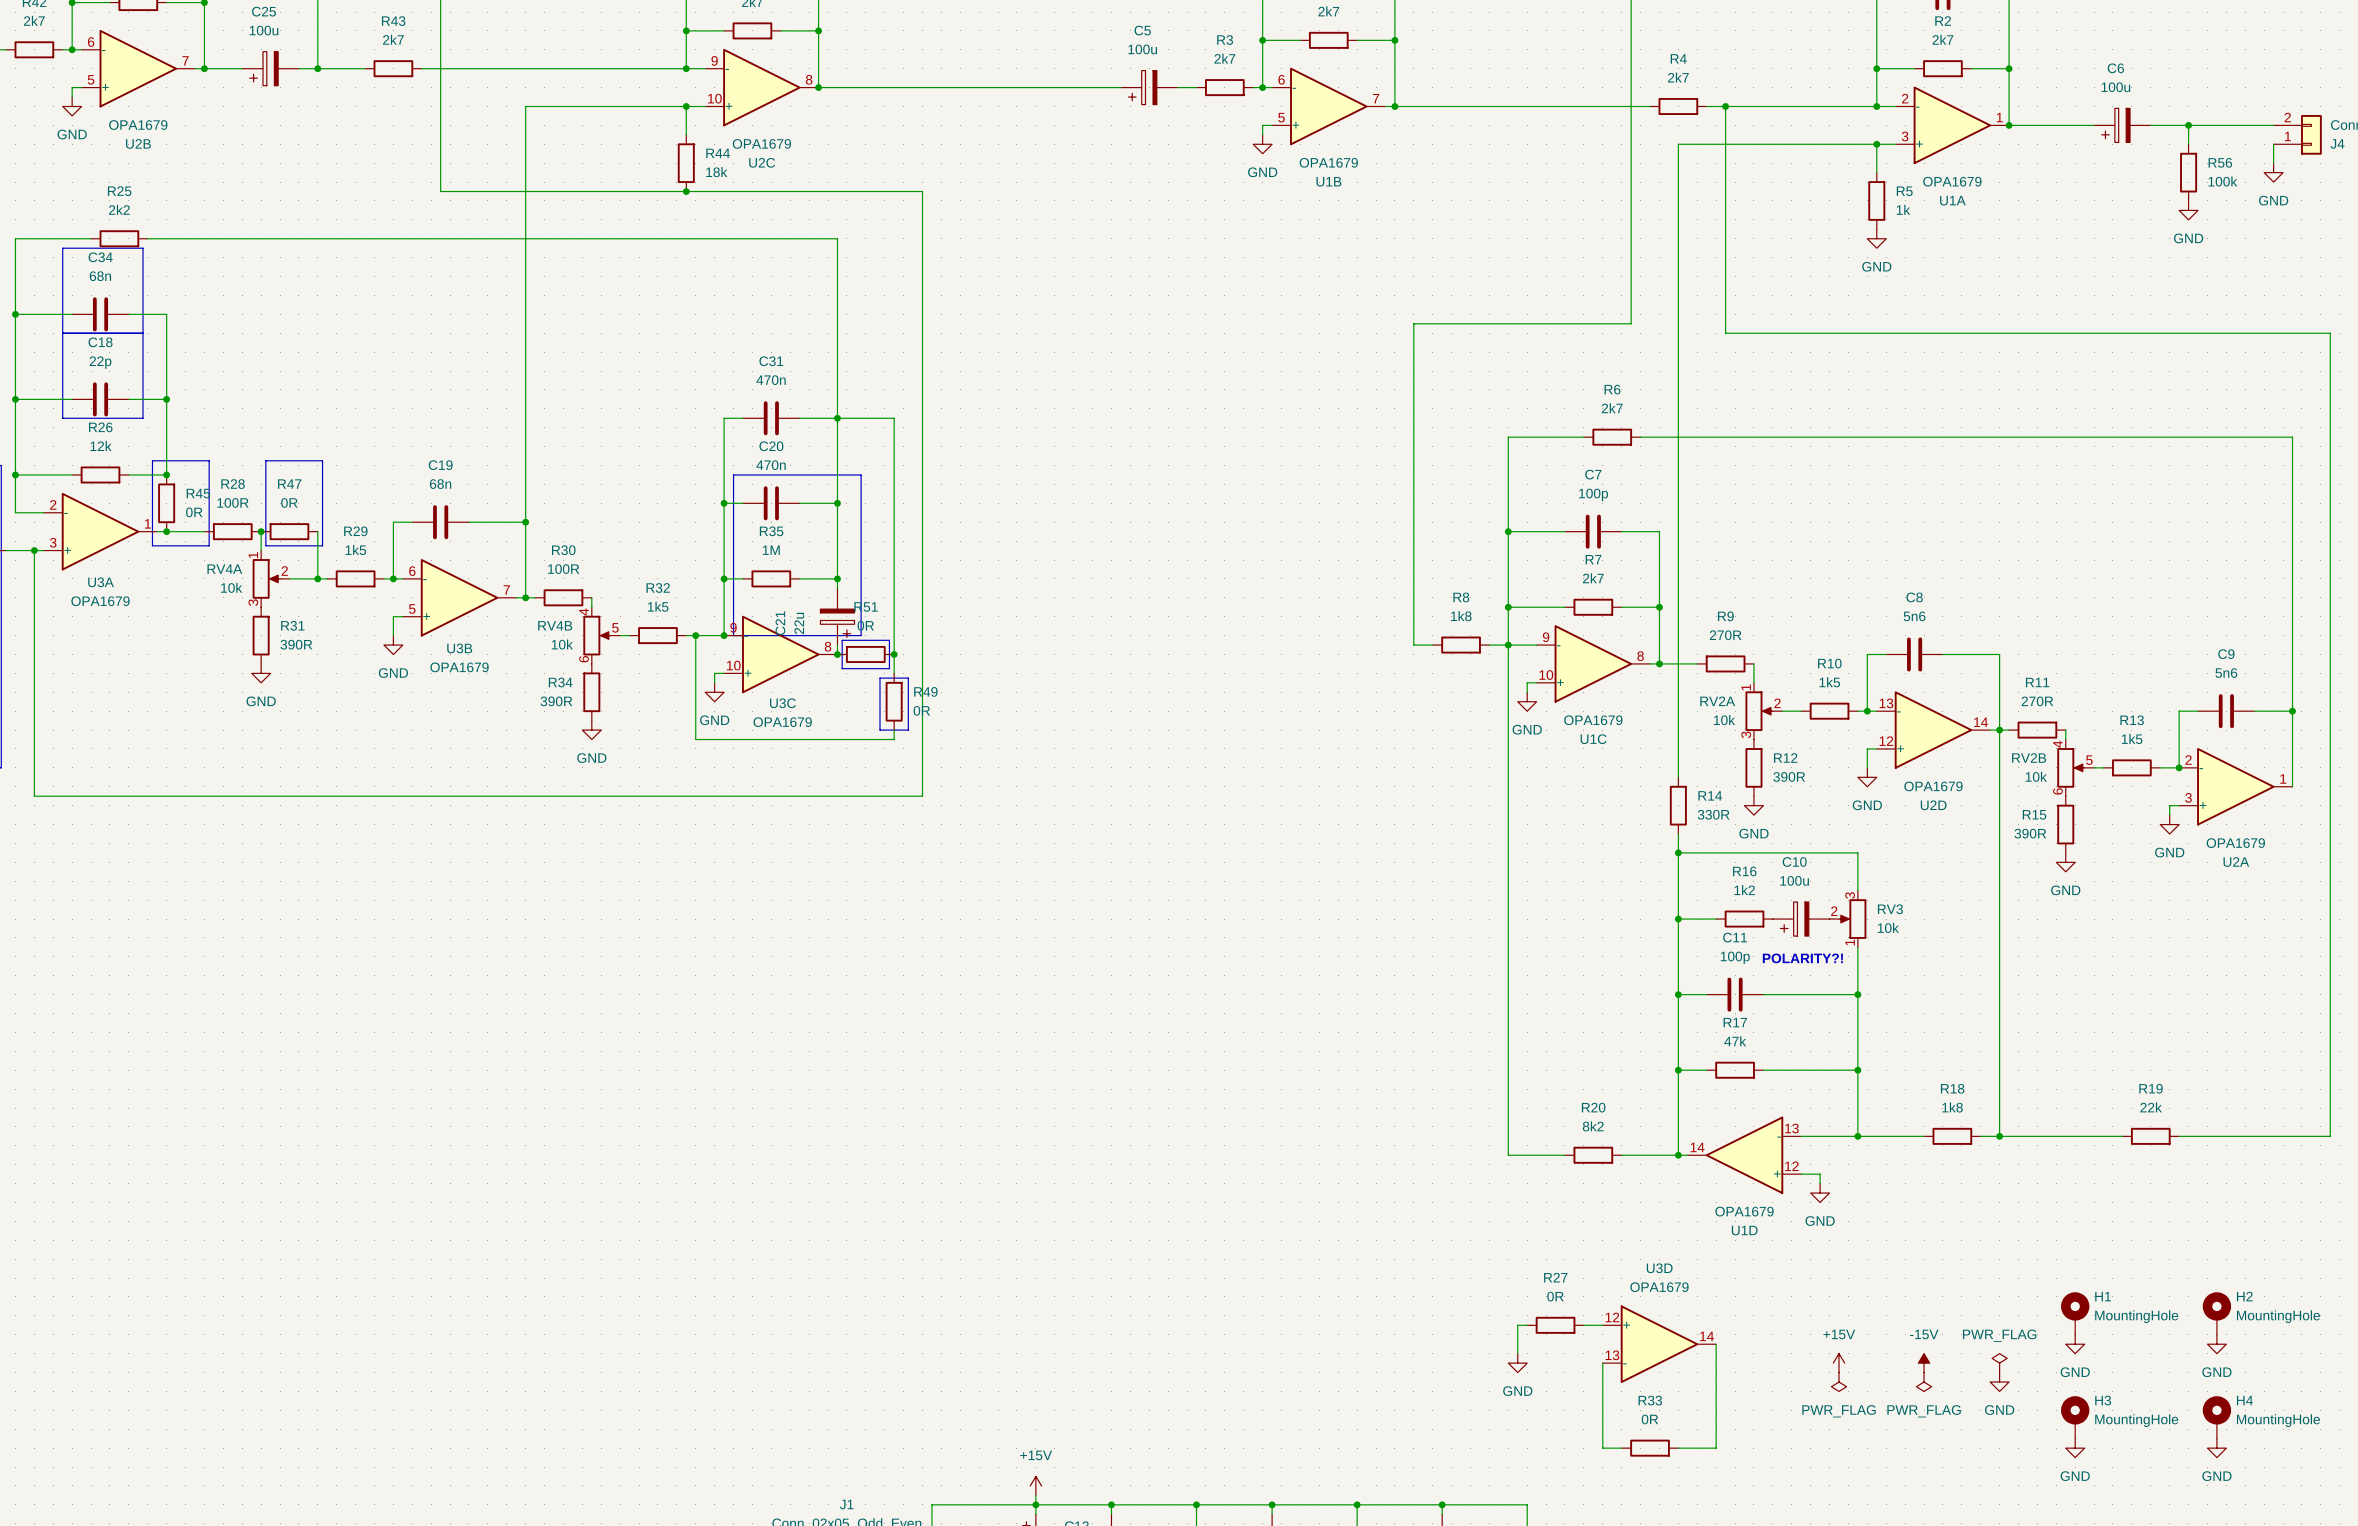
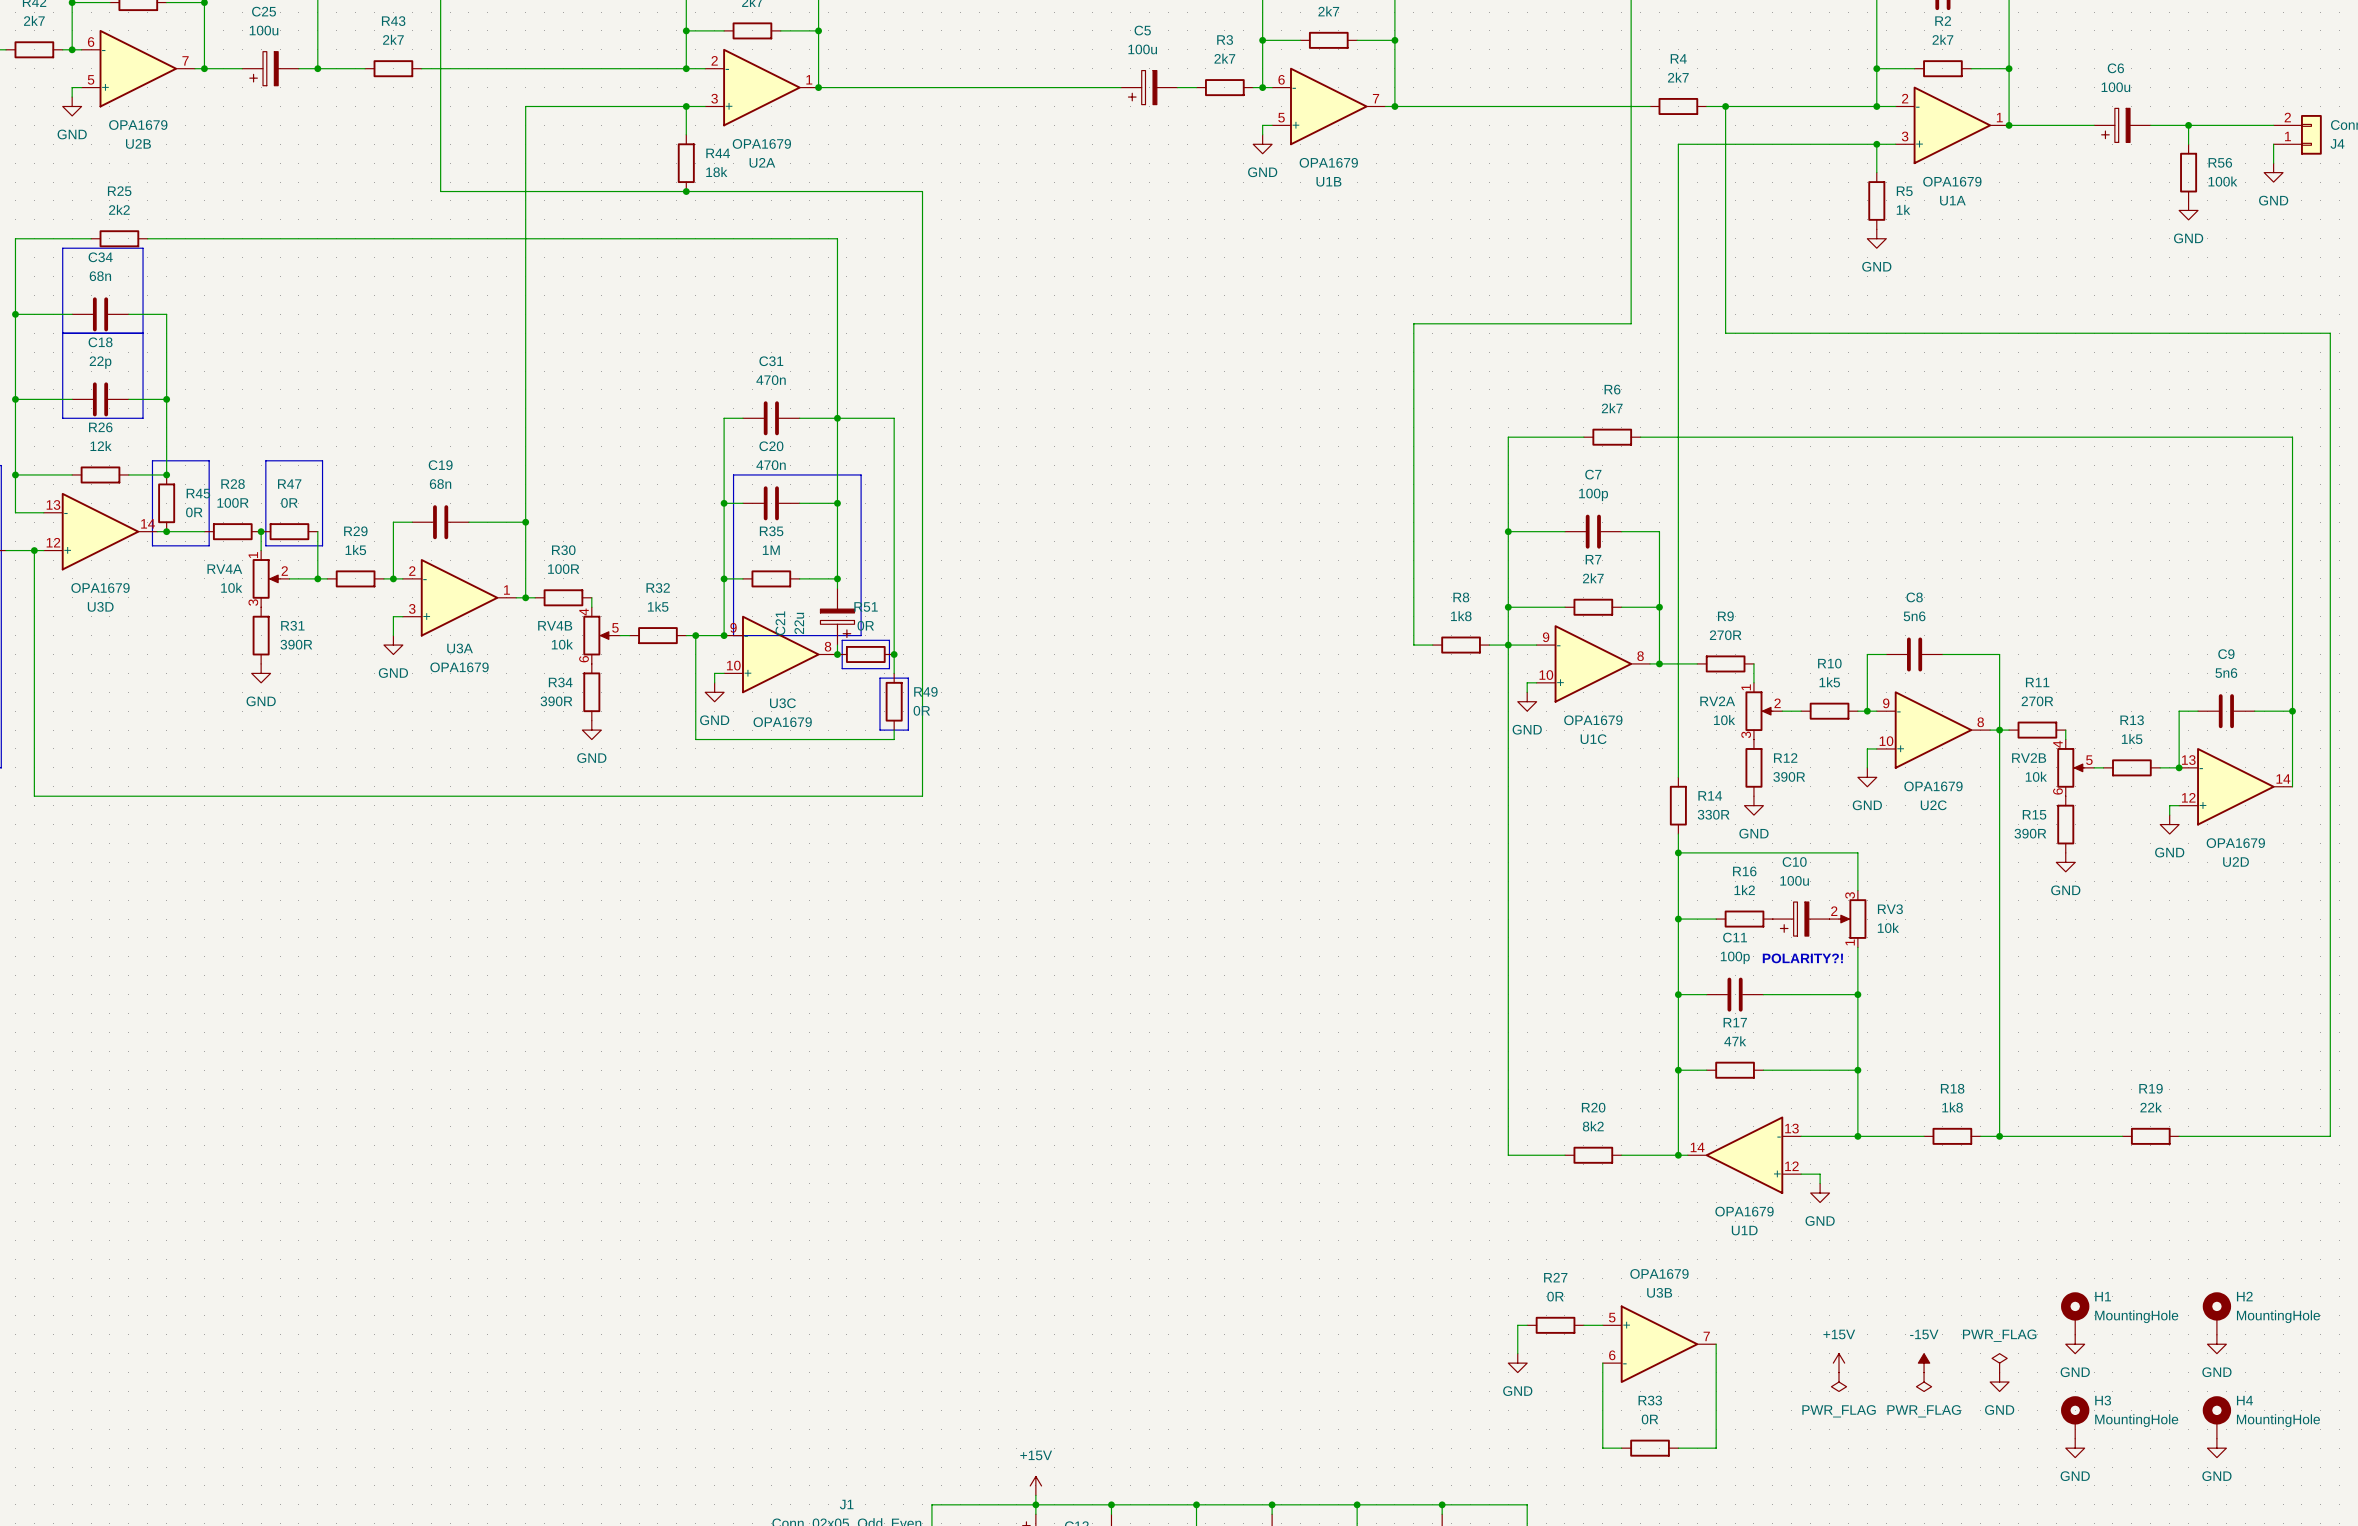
U2C position: (761, 87) -> (1933, 730)
U3A position: (100, 531) -> (459, 597)
U3B flip: as is (459, 597) -> up-down (1659, 1344)
U3B position: (459, 597) -> (1659, 1344)
U2D position: (1933, 730) -> (2235, 786)
U2A position: (2235, 786) -> (761, 87)
U3D flip: as is (1659, 1344) -> up-down (100, 531)
U3D position: (1659, 1344) -> (100, 531)

